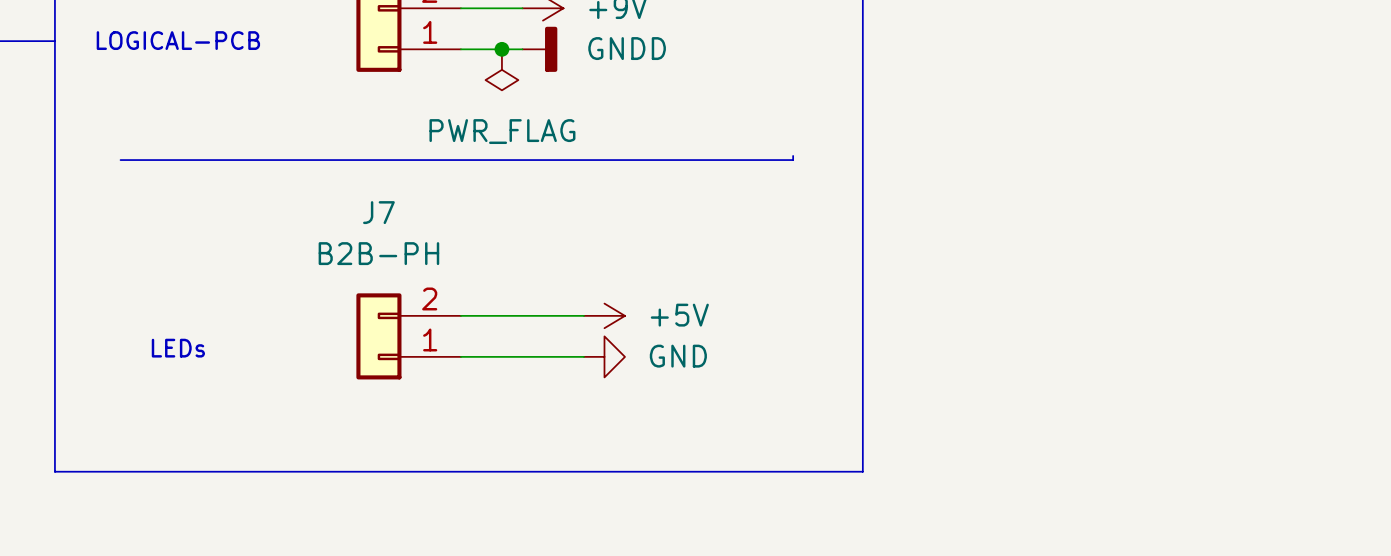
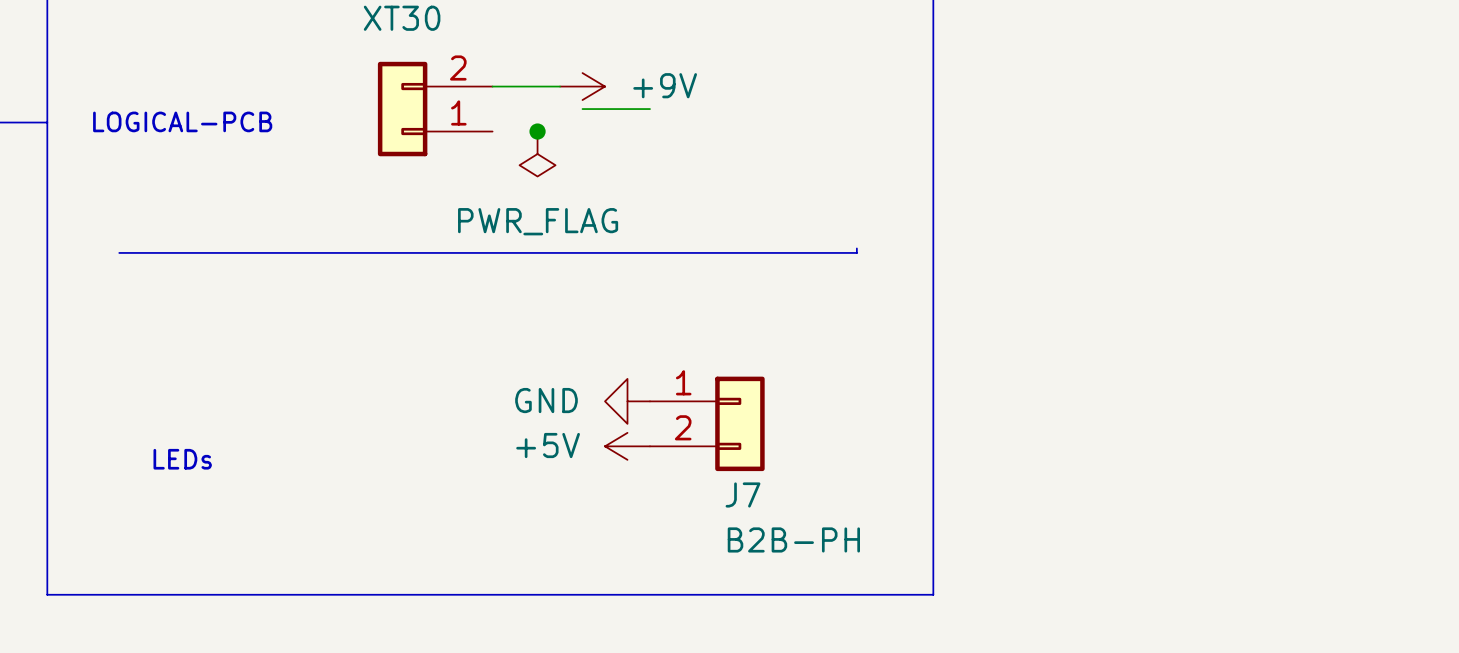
wire: (460, 49) (522, 49) -> (582, 109) (649, 109)
power symbol: GNDD (539, 49) -> none
J7 name position: J7 (378, 212) -> J7 (743, 494)
J7 value position: B2B-PH (378, 253) -> B2B-PH (793, 539)
wire: (460, 315) (583, 315) -> none
power symbol rotation: 0° (604, 315) -> 180° (627, 446)
power symbol position: +5V (604, 315) -> +5V (627, 446)
J7 rotation: 0° (378, 336) -> 180° (739, 423)
J7 position: (408, 336) -> (707, 423)
wire: (460, 356) (583, 356) -> none
power symbol rotation: 0° (604, 356) -> 180° (627, 401)
power symbol position: GND (604, 356) -> GND (627, 401)

